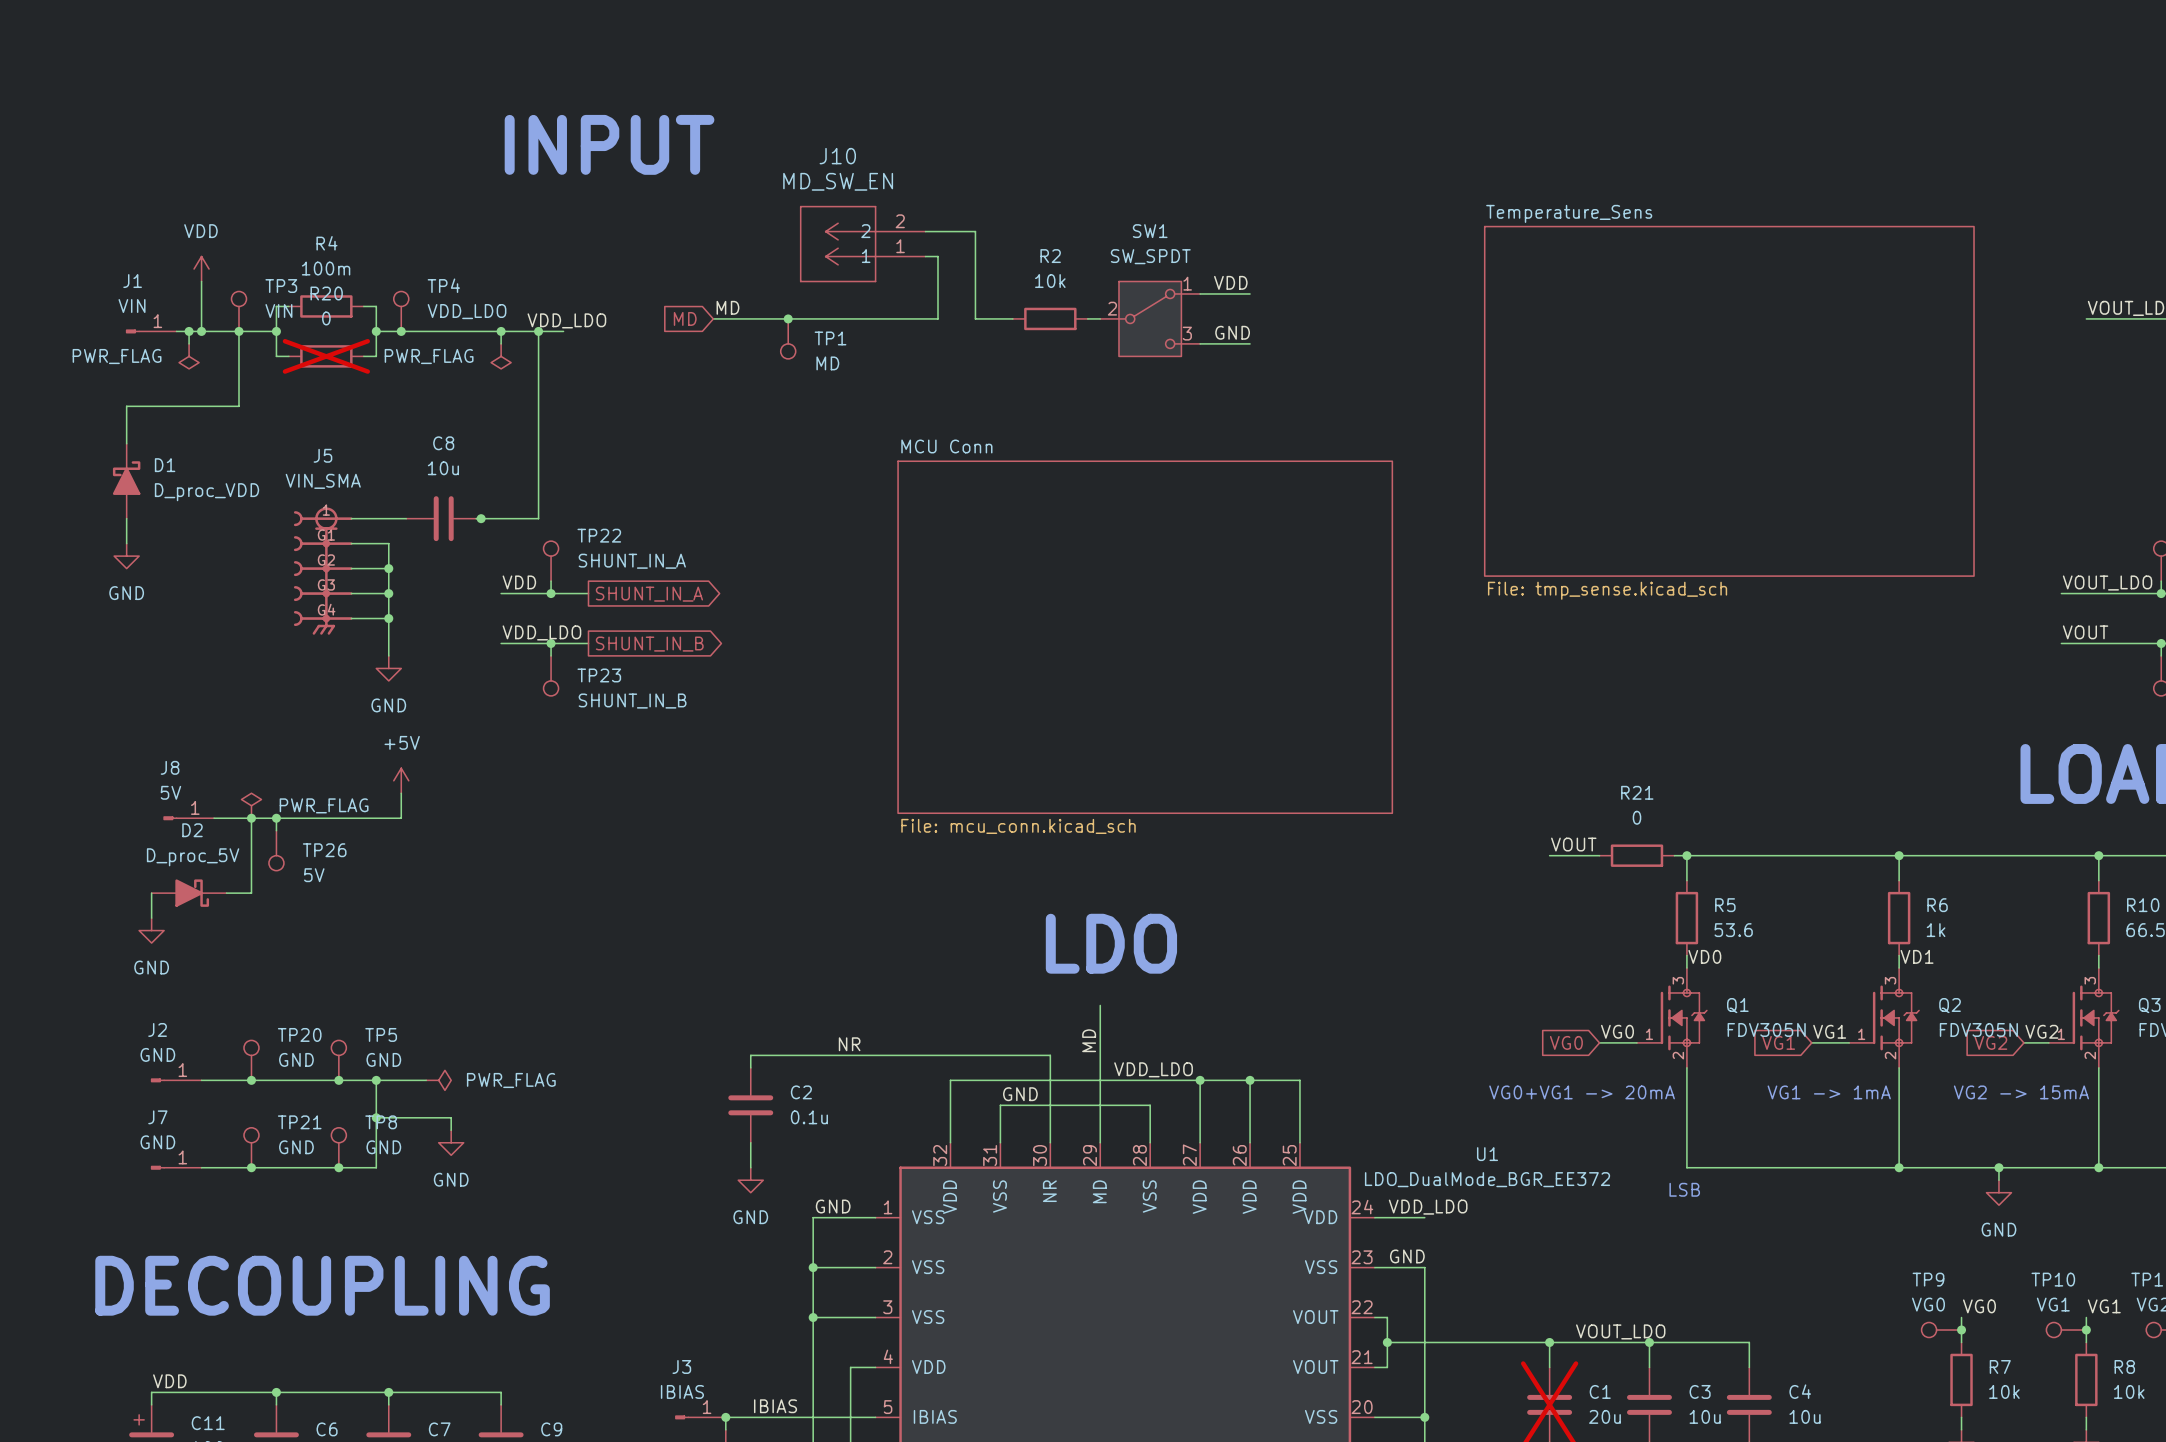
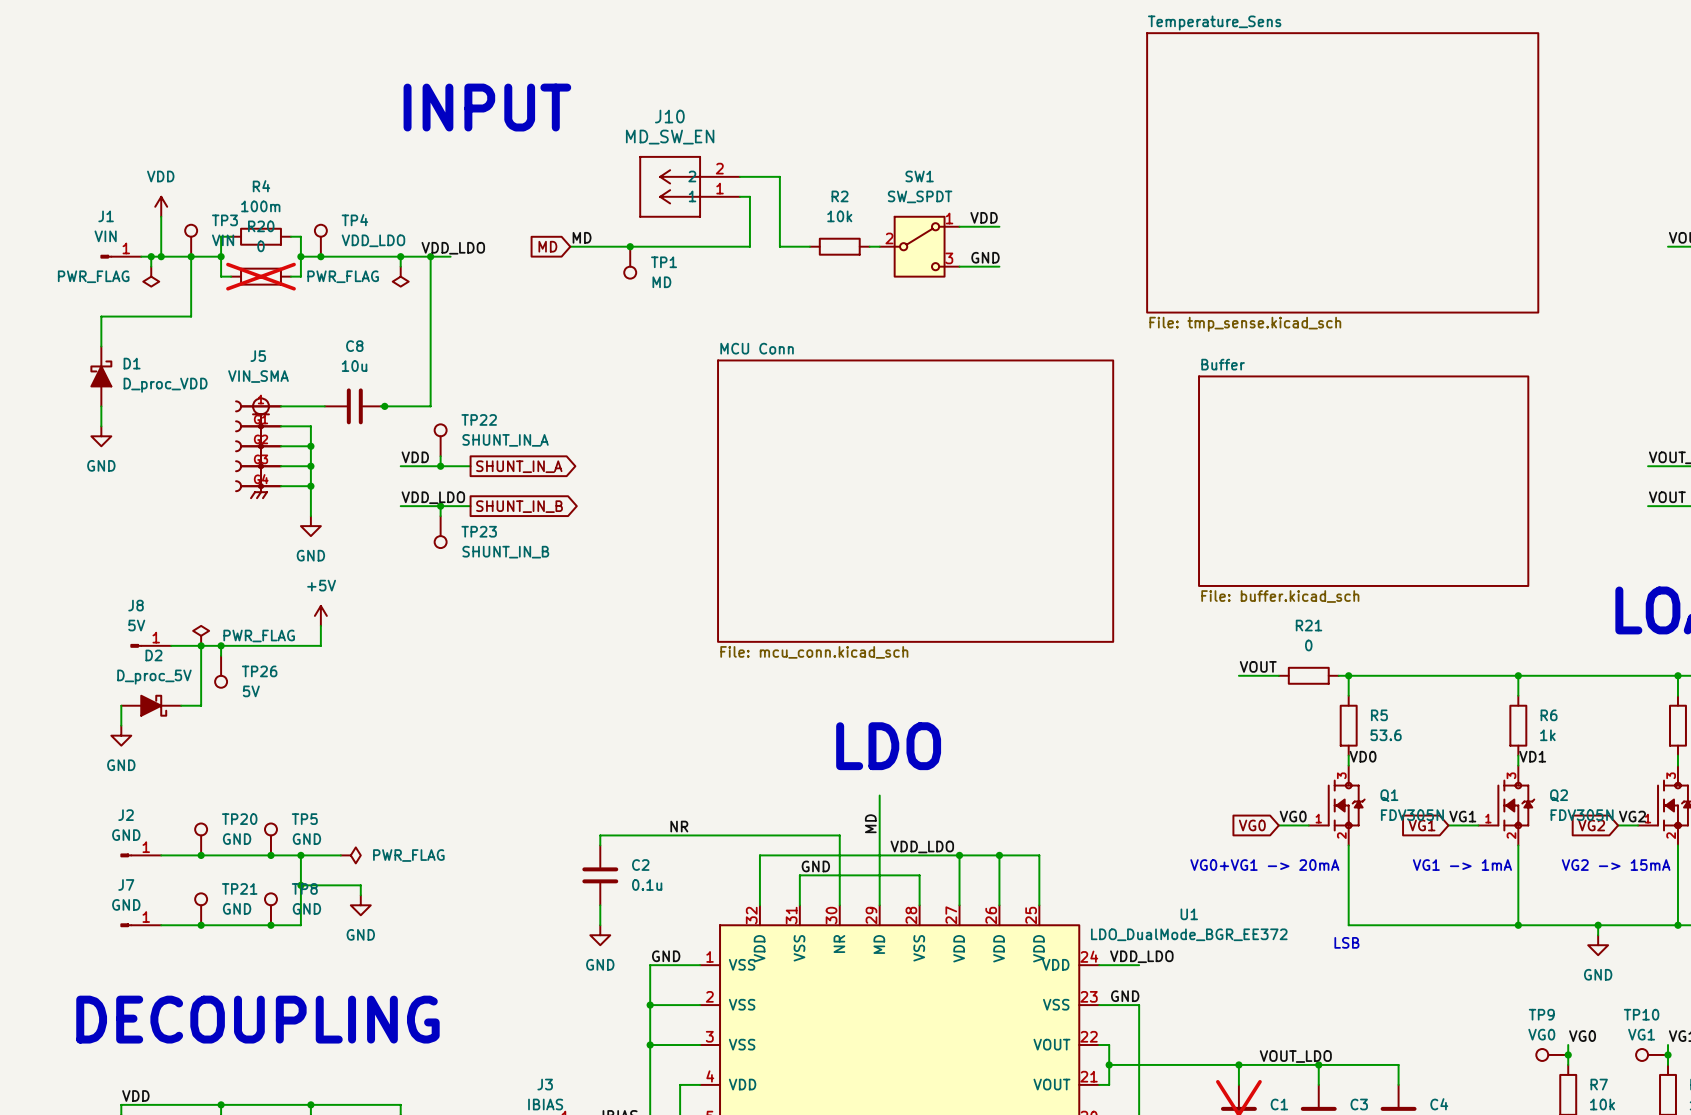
sheet Temperature_Sens position: (1729, 401) -> (1342, 172)
sheet Buffer: none -> File: buffer.kicad_sch (1363, 481)

